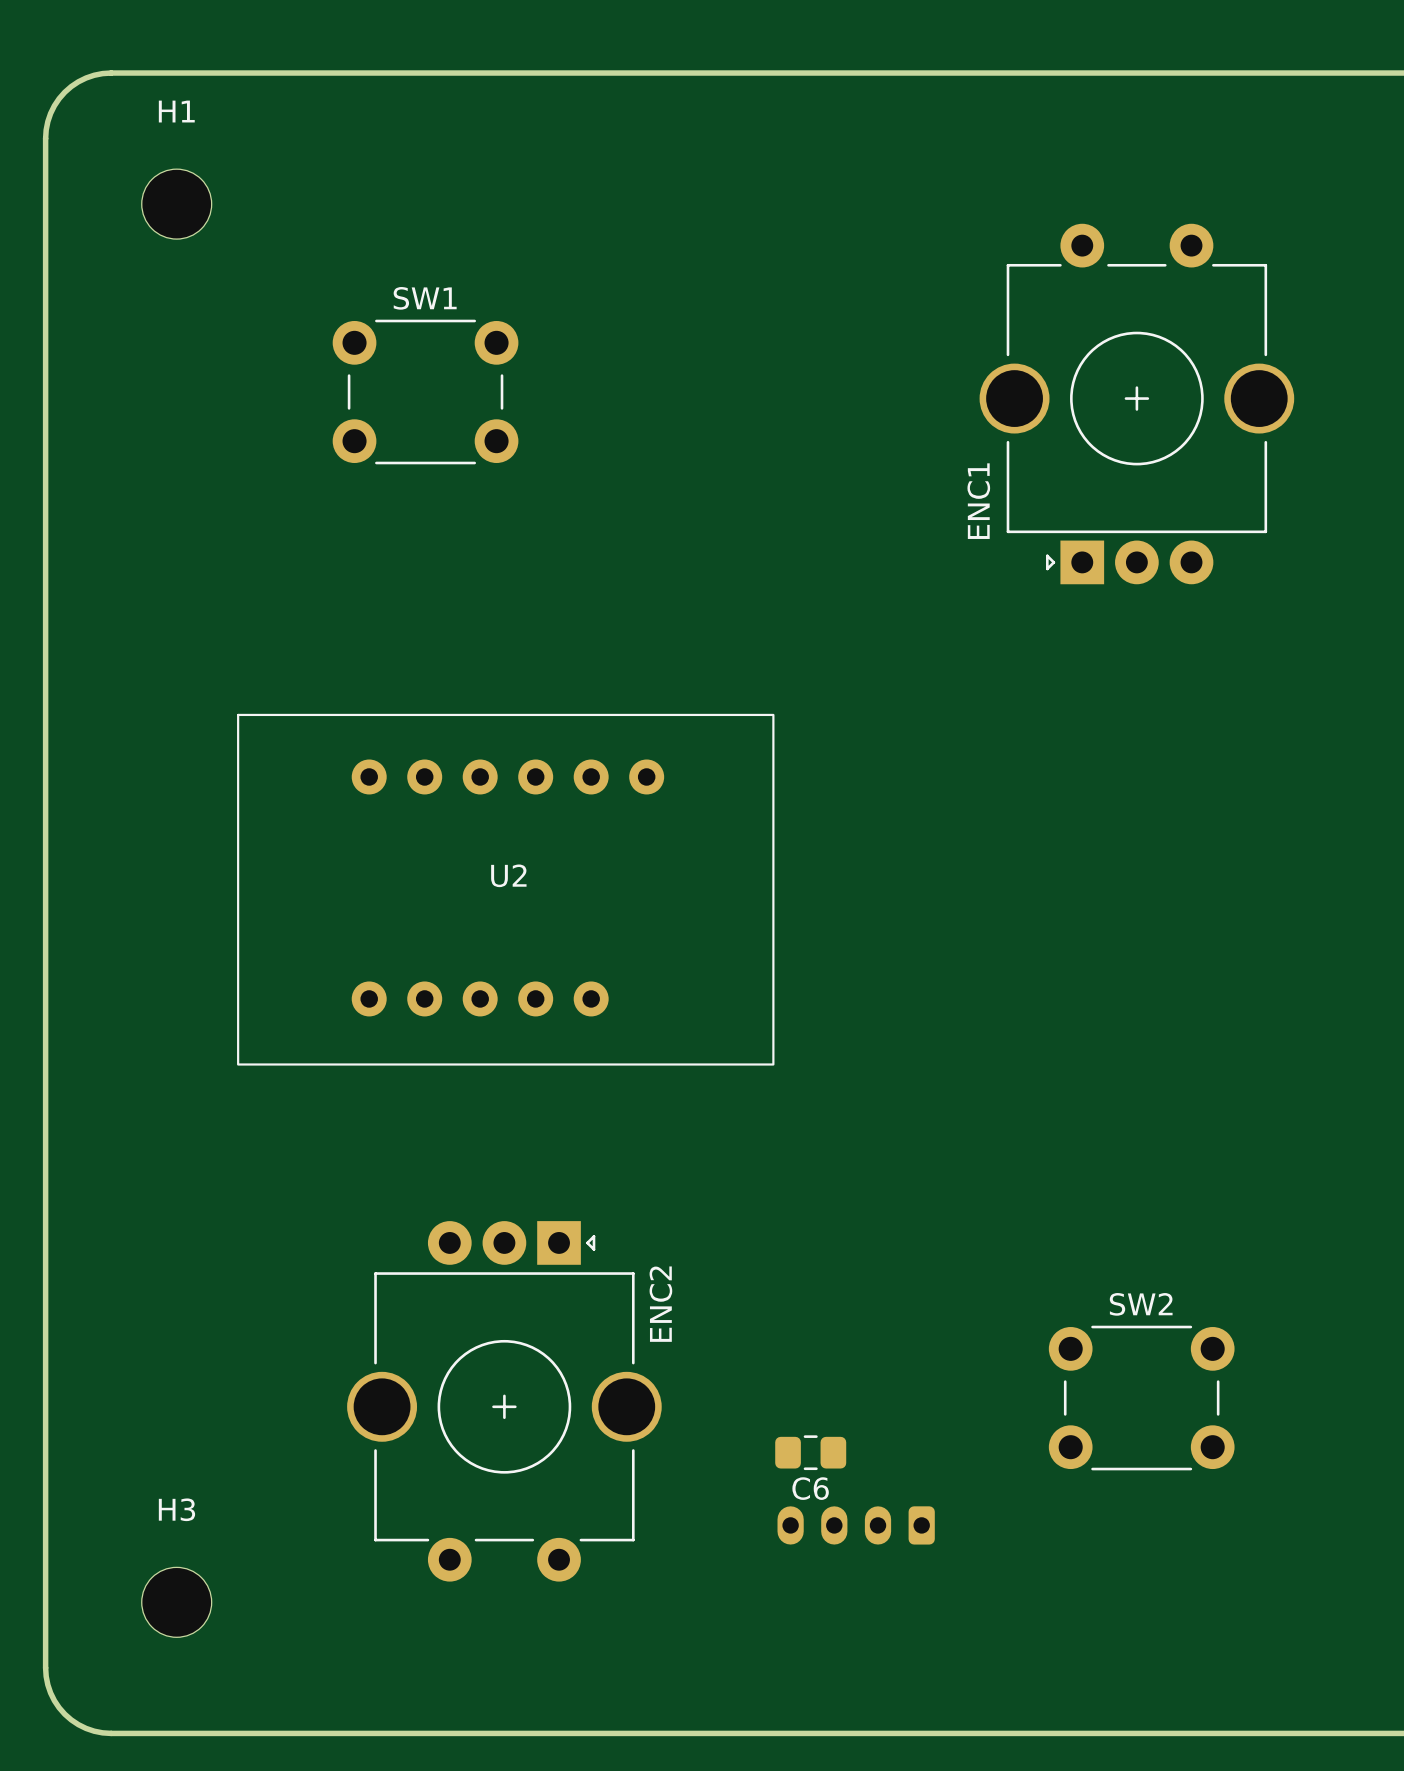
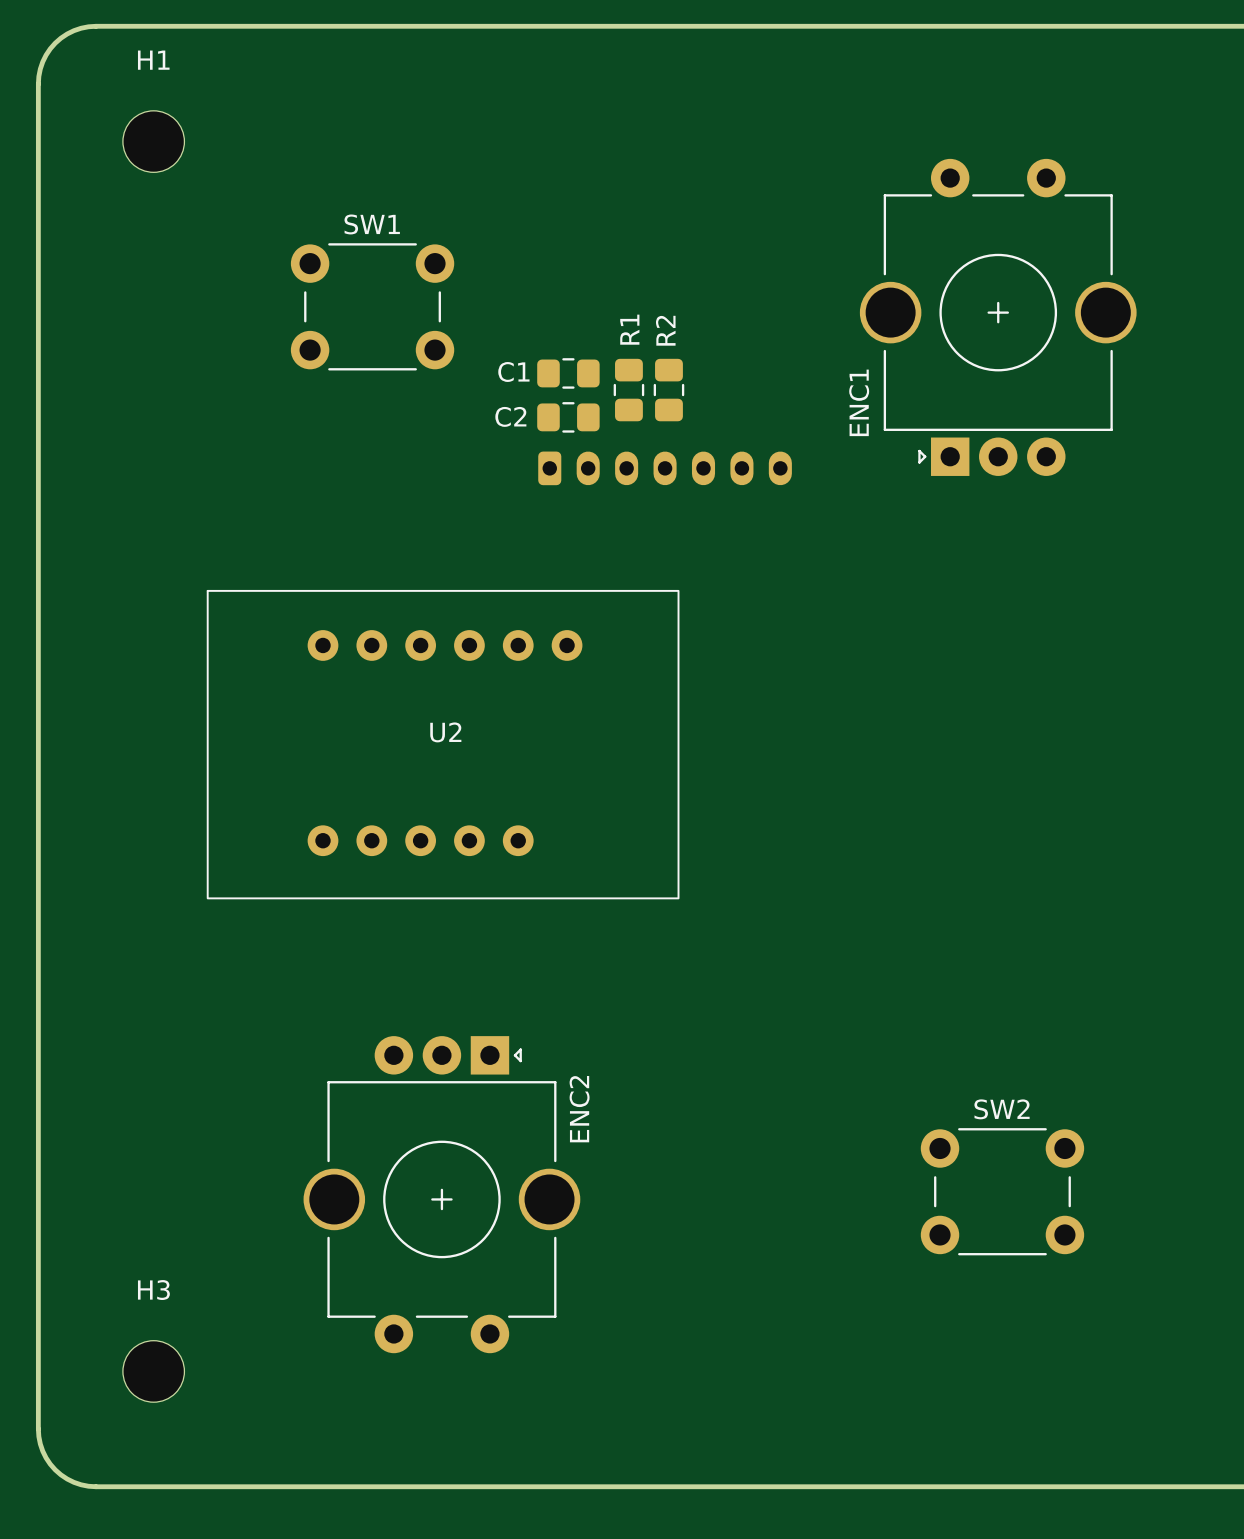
C1: none -> (568, 373)
R1: none -> (628, 390)
R2: none -> (668, 390)
C2: none -> (568, 417)
part: none -> (665, 468)
C6: (810, 1452) -> none
part: (856, 1525) -> none

